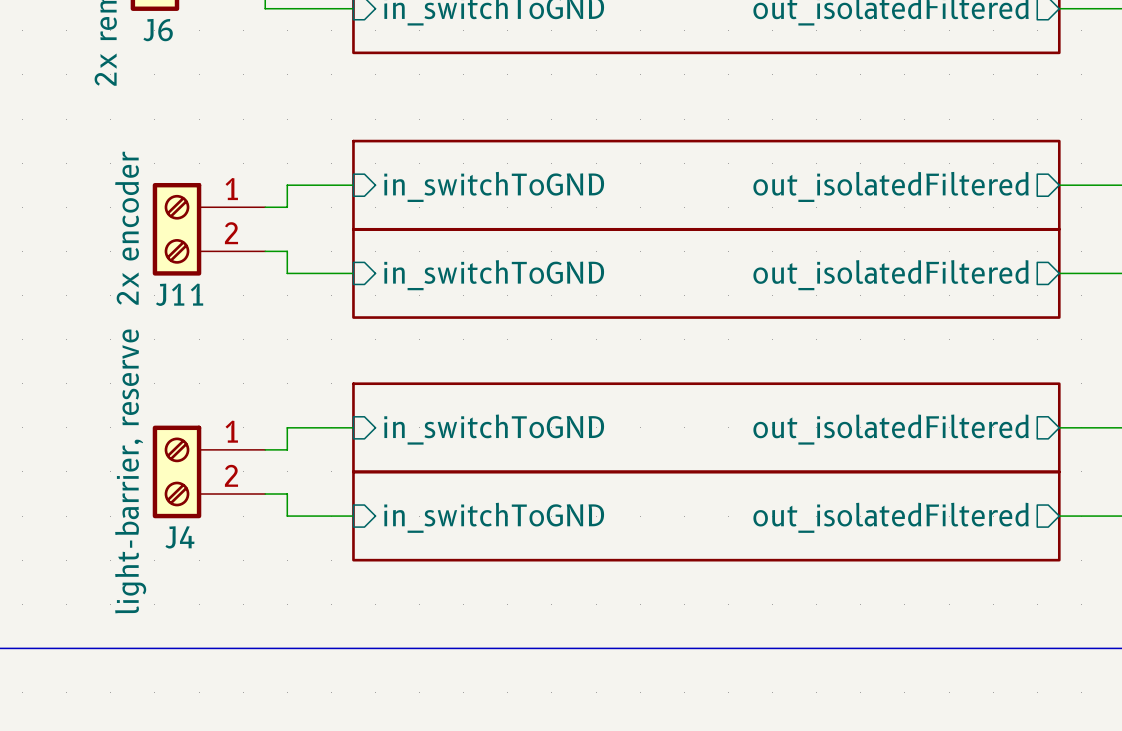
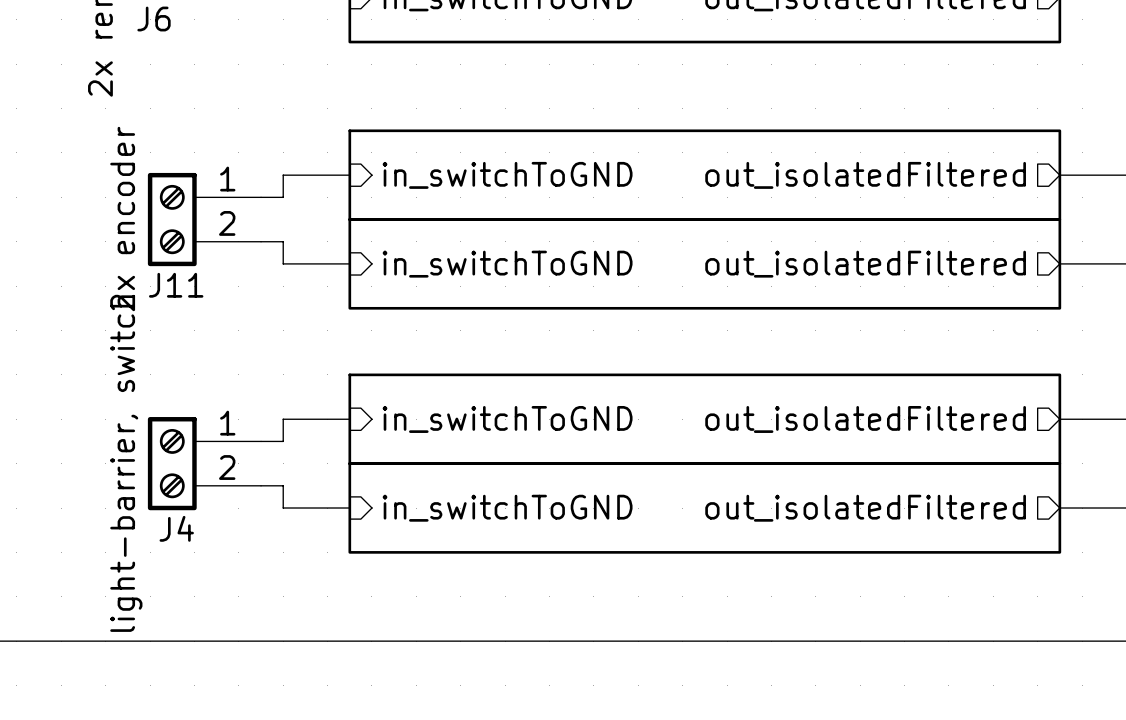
J4 value: light-barrier, reserve (130, 471) -> light-barrier, switch (126, 463)

